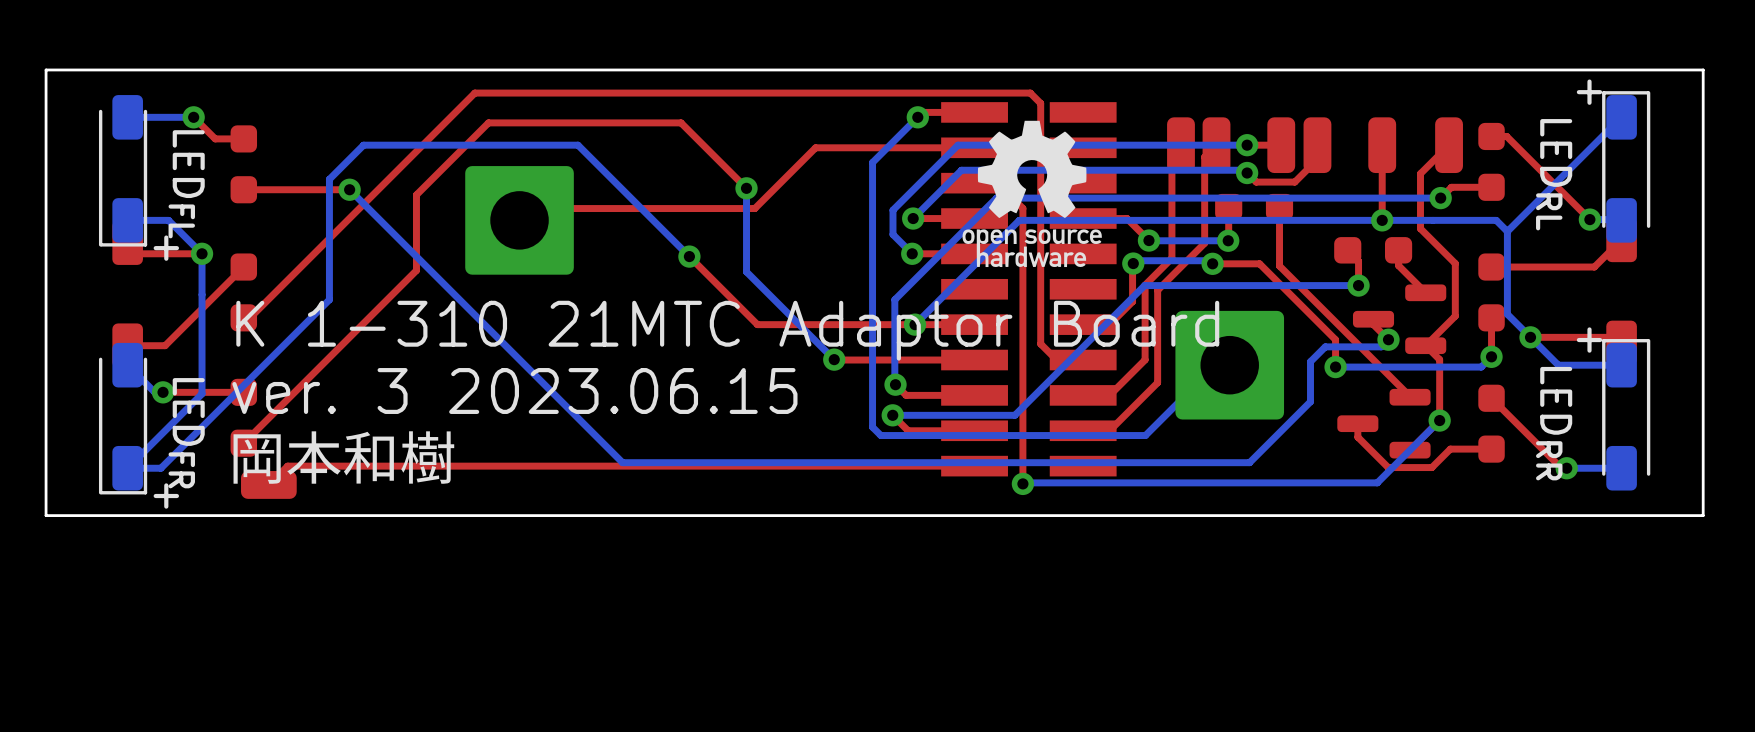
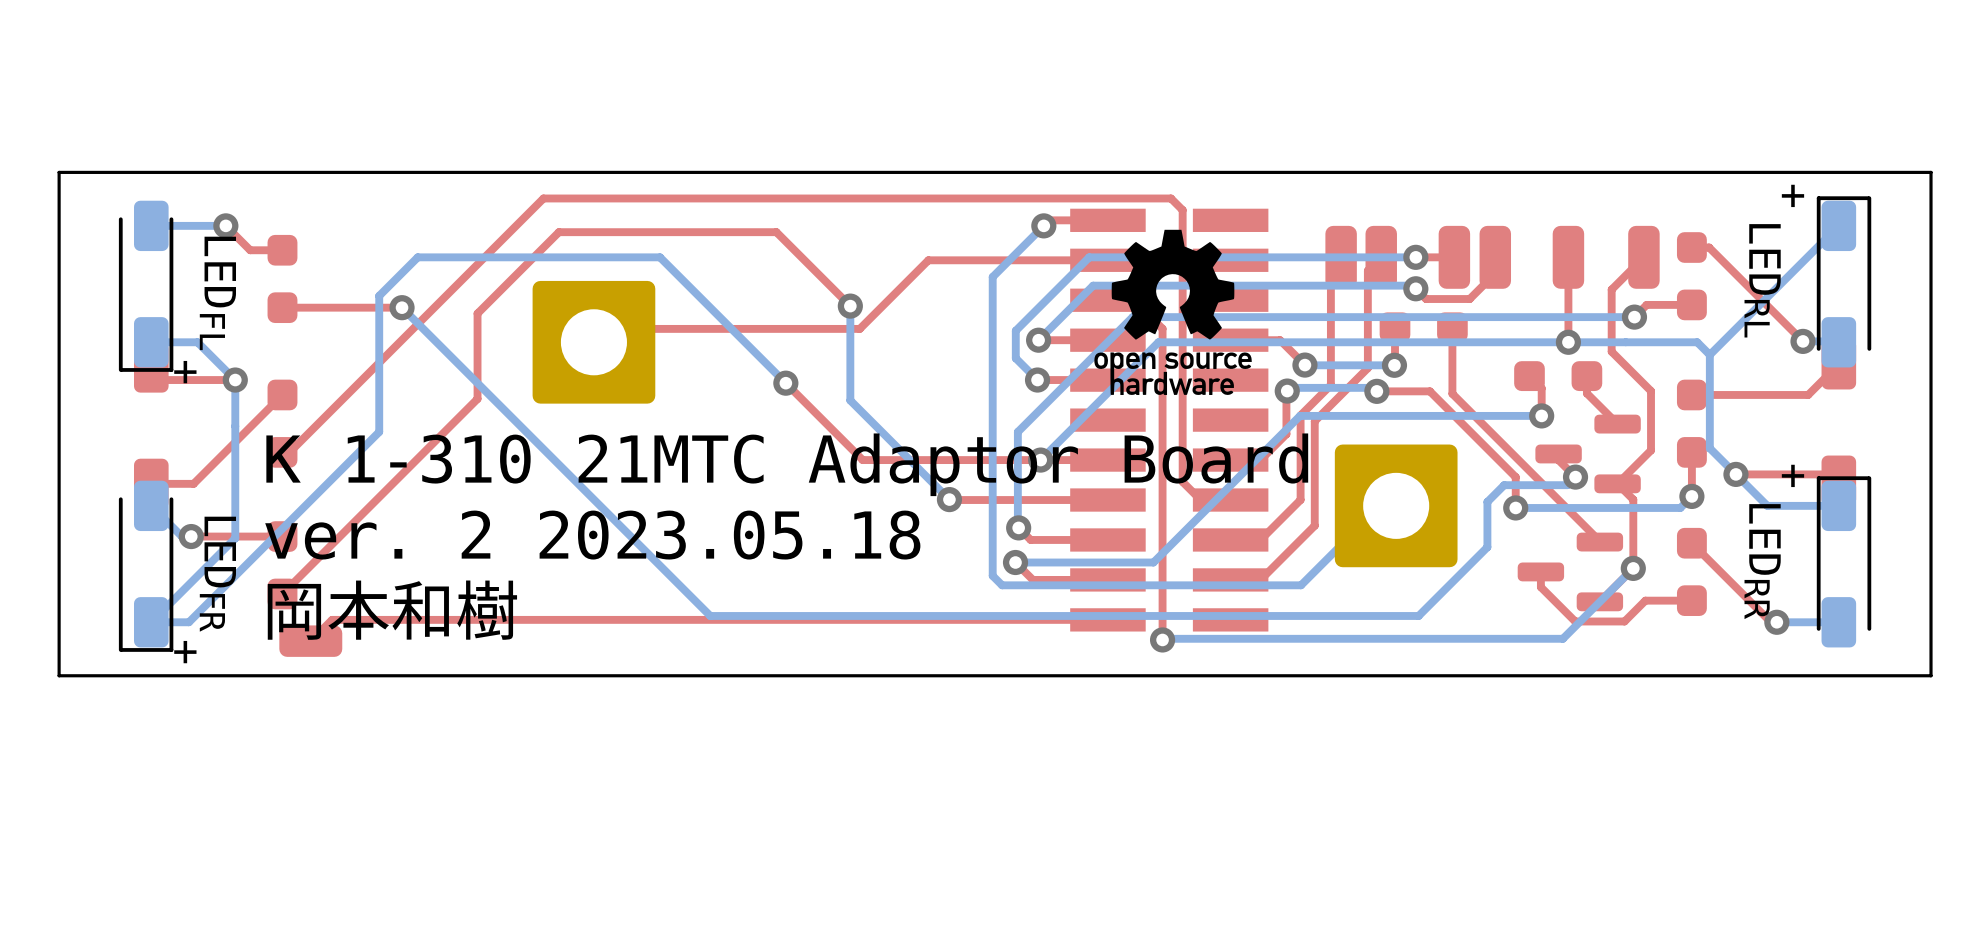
text: ver. 3 2023.06.15 (514, 391) -> ver. 2 2023.05.18 (592, 535)

